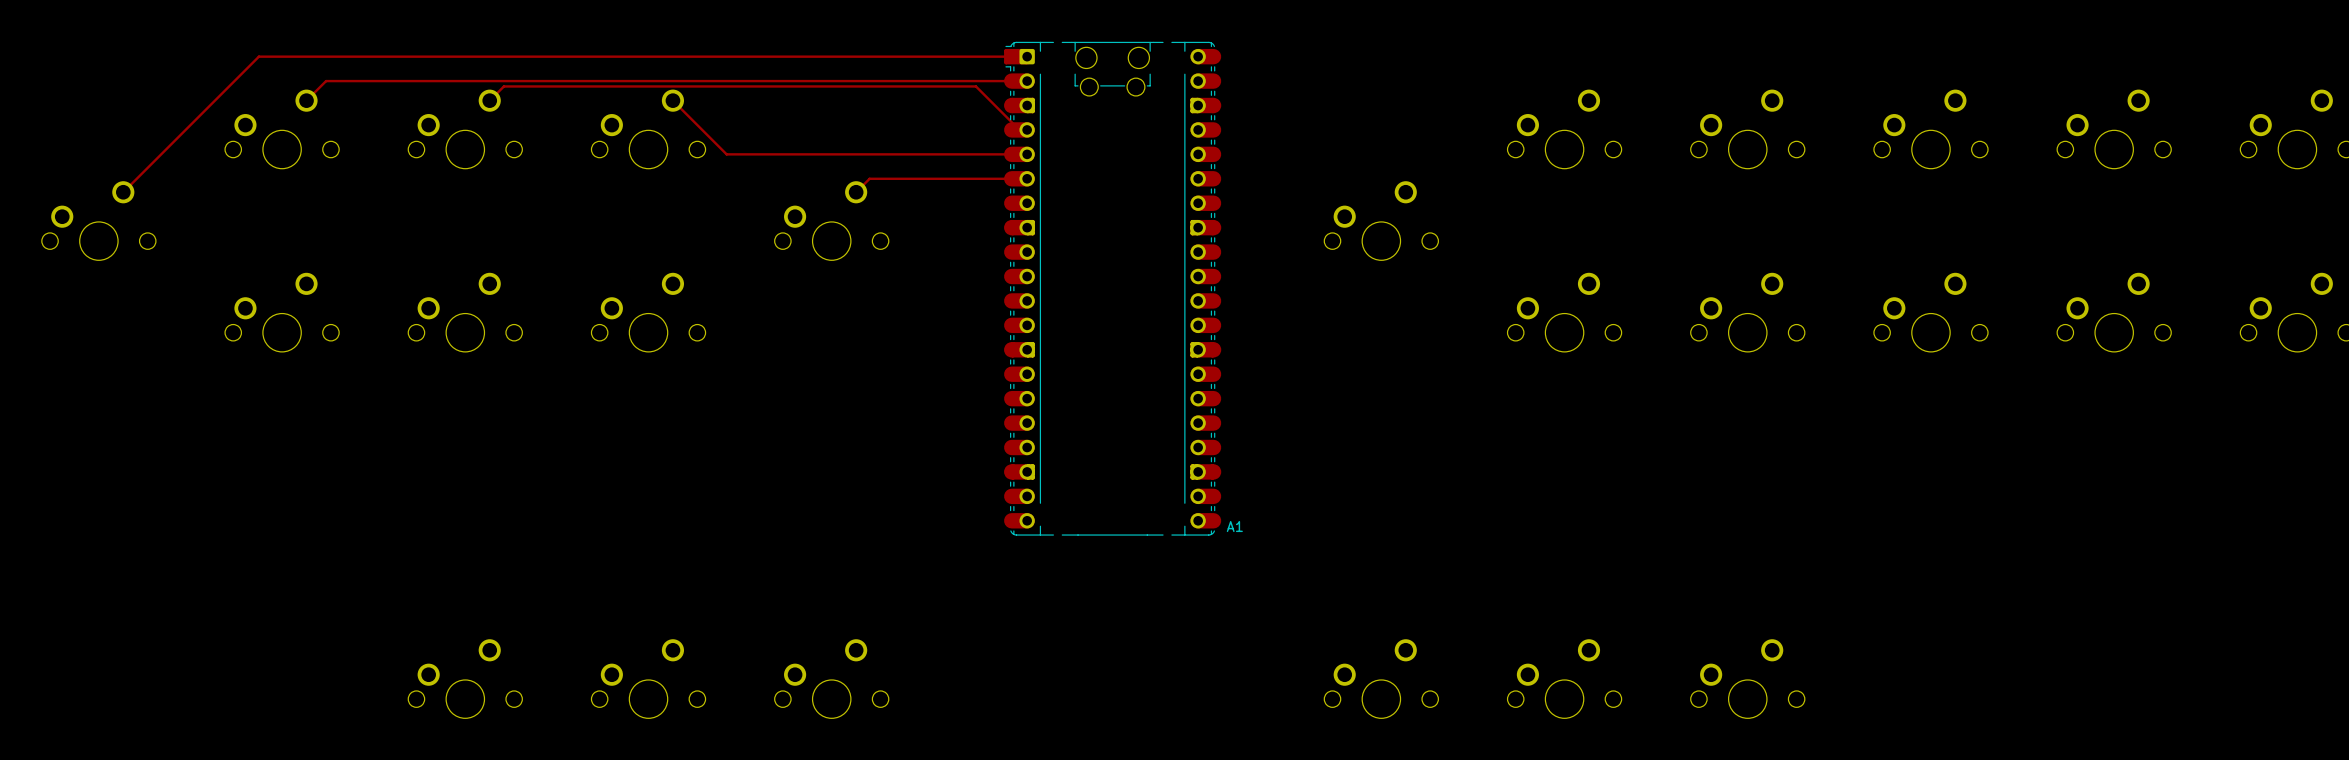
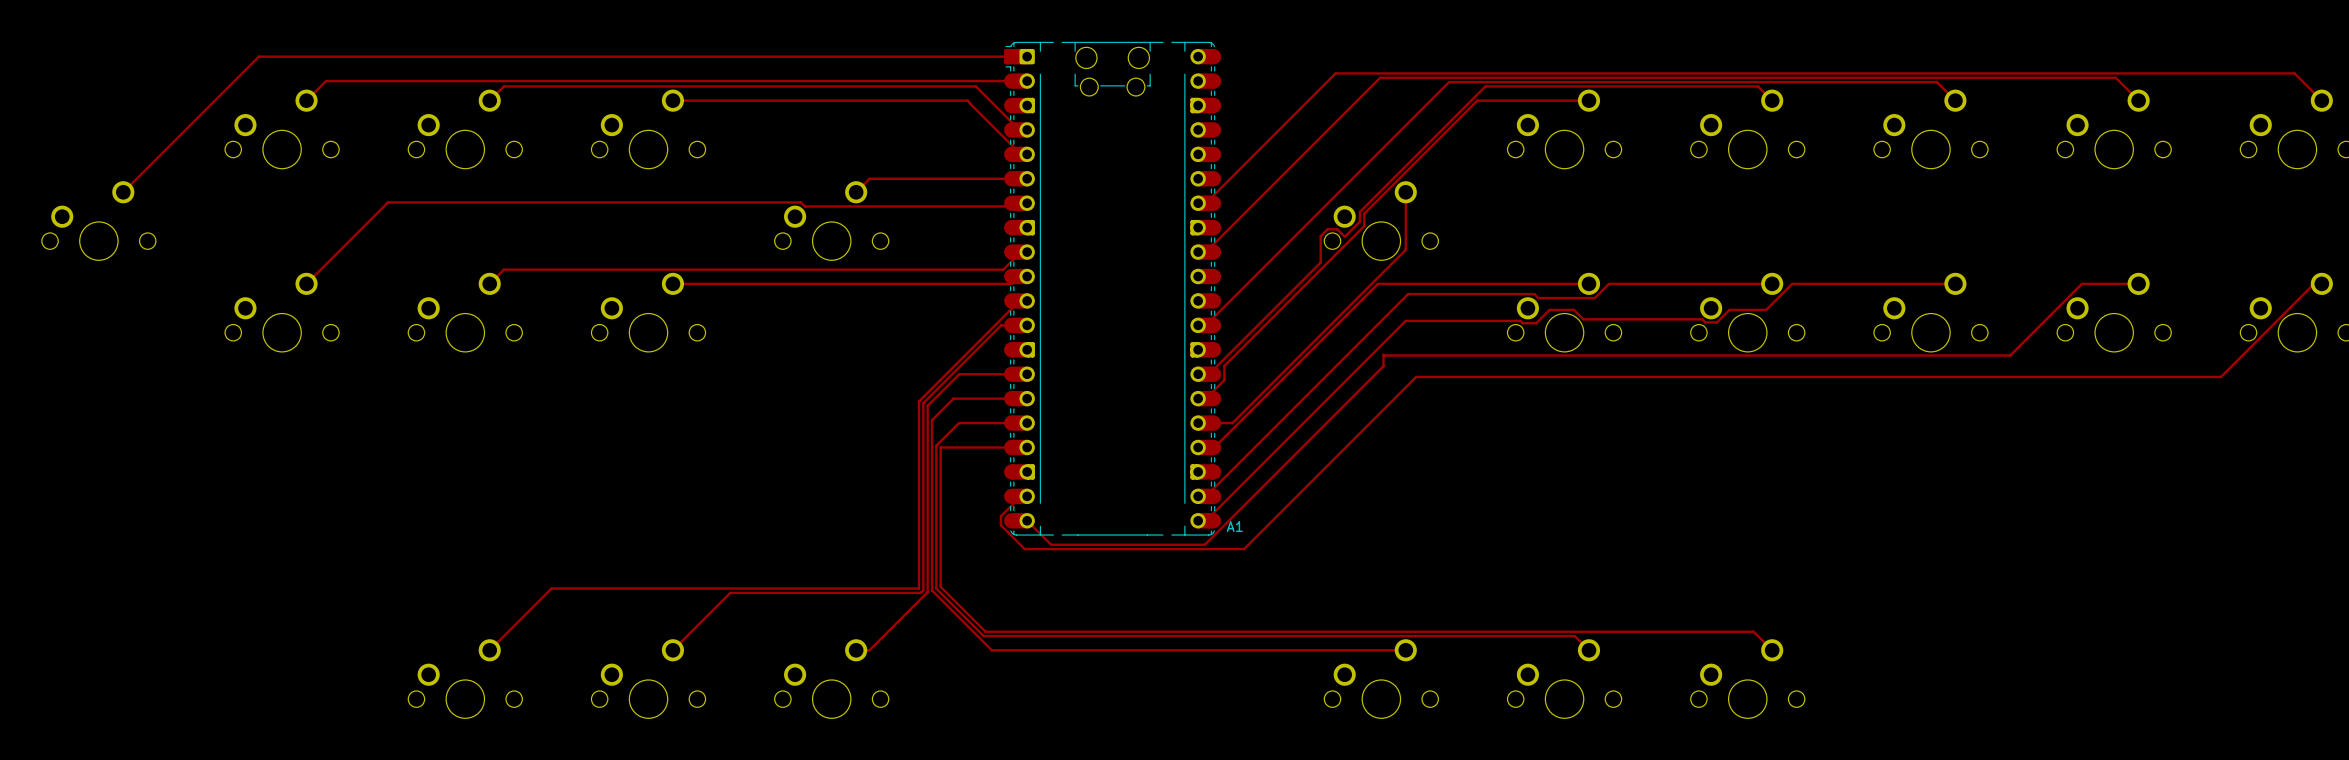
track: (672, 100) (726, 154) (1019, 154) -> (672, 100) (967, 100) (1020, 154) (1027, 154)
track: none -> (1588, 100) (1477, 100) (1364, 213) (1364, 226) (1224, 365) (1224, 380) (1205, 398)
track: none -> (1772, 100) (1758, 86) (1485, 86) (1359, 211) (1359, 221) (1345, 236) (1337, 229) (1327, 229) (1320, 236) (1320, 262) (1209, 374) (1198, 374)
track: none -> (1955, 100) (1936, 82) (1449, 82) (1205, 325)
track: none -> (2138, 100) (2115, 77) (1380, 77) (1205, 252)
track: none -> (2321, 100) (2294, 73) (1335, 73) (1205, 203)
track: none -> (1405, 192) (1405, 249) (1232, 423) (1205, 423)
track: none -> (1027, 203) (1023, 206) (804, 206) (800, 202) (387, 202) (306, 283)
track: none -> (1027, 252) (1020, 252) (1003, 269) (503, 269) (489, 283)
track: none -> (1019, 276) (1012, 283) (672, 283)
track: none -> (1588, 283) (1377, 283) (1214, 447) (1205, 447)
track: none -> (1772, 283) (1609, 283) (1594, 298) (1538, 298) (1534, 294) (1408, 294) (1205, 496)
track: none -> (1955, 283) (1792, 283) (1766, 309) (1729, 309) (1717, 322) (1705, 322) (1702, 319) (1583, 319) (1574, 309) (1549, 309) (1536, 323) (1522, 323) (1520, 320) (1405, 320) (1205, 520)
track: none -> (2138, 283) (2081, 283) (2010, 355) (1383, 354) (1383, 366) (1204, 544) (1051, 544) (1027, 520)
track: none -> (2321, 283) (2314, 283) (2220, 376) (1416, 376) (1244, 549) (1024, 549) (1000, 525) (1000, 516) (1020, 496) (1027, 496)
track: none -> (1019, 300) (919, 401) (919, 588) (551, 588) (489, 650)
track: none -> (1027, 325) (1001, 325) (923, 403) (923, 590) (920, 592) (730, 592) (672, 650)
track: none -> (1027, 374) (959, 374) (927, 405) (927, 592) (869, 650) (856, 650)
track: none -> (1027, 398) (953, 398) (932, 420) (932, 590) (991, 650) (1405, 650)
track: none -> (1027, 423) (958, 423) (936, 445) (936, 588) (983, 636) (1574, 636) (1588, 650)
track: none -> (1019, 447) (940, 447) (940, 586) (985, 631) (1753, 631) (1772, 650)

